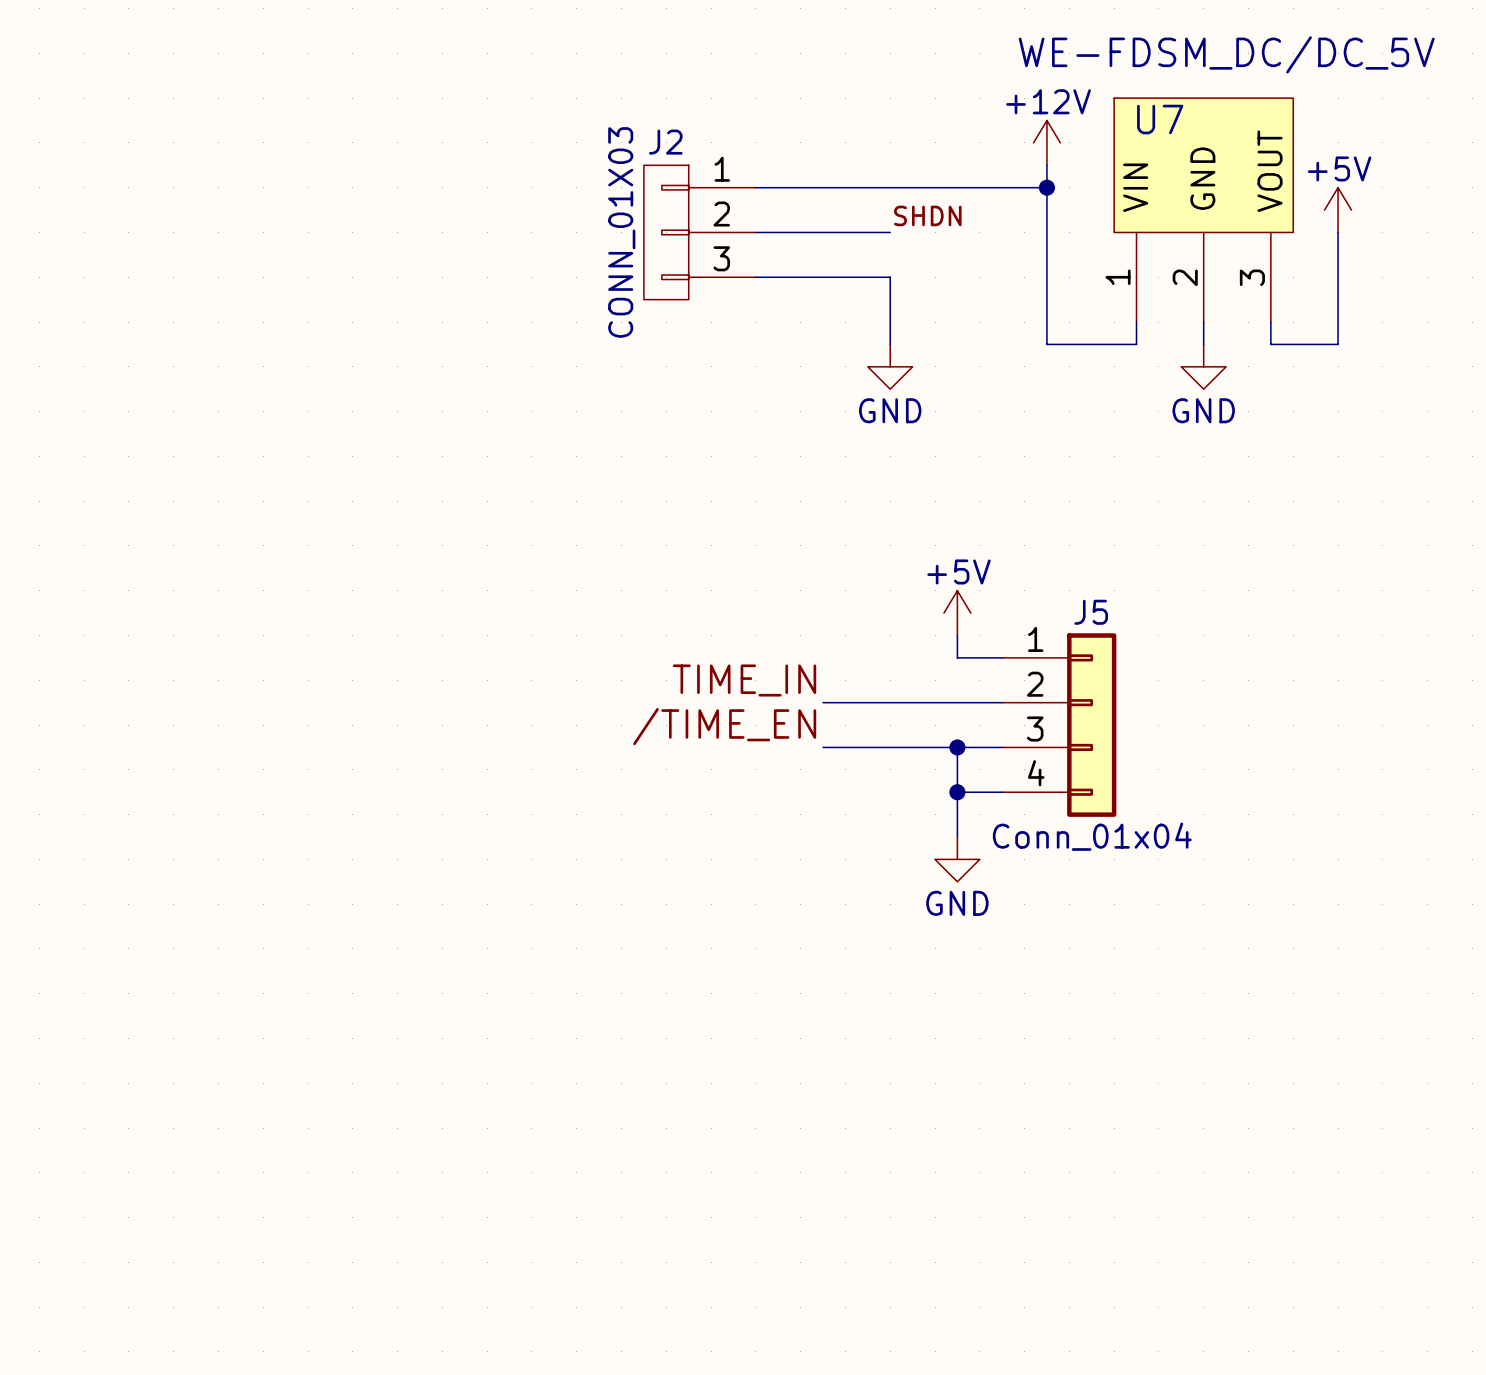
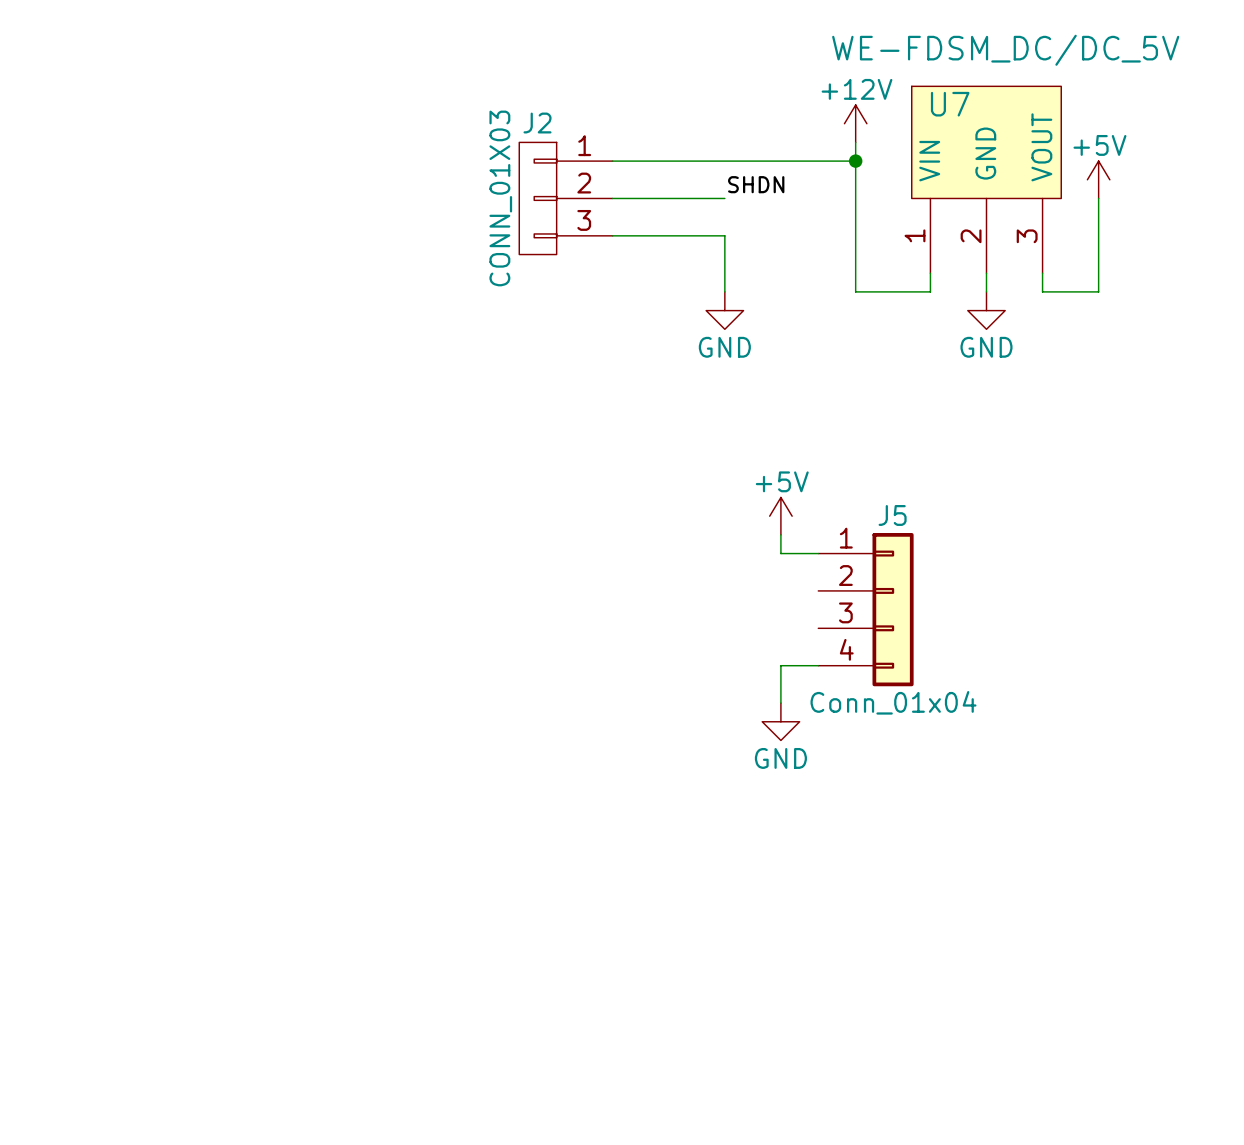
label: TIME_IN (744, 680) -> none
wire: (823, 702) (1002, 702) -> none
label: /TIME_EN (724, 726) -> none
wire: (823, 747) (1002, 747) -> none
wire: (957, 747) (957, 792) -> none
junction: (957, 747) -> none
junction: (957, 792) -> none

